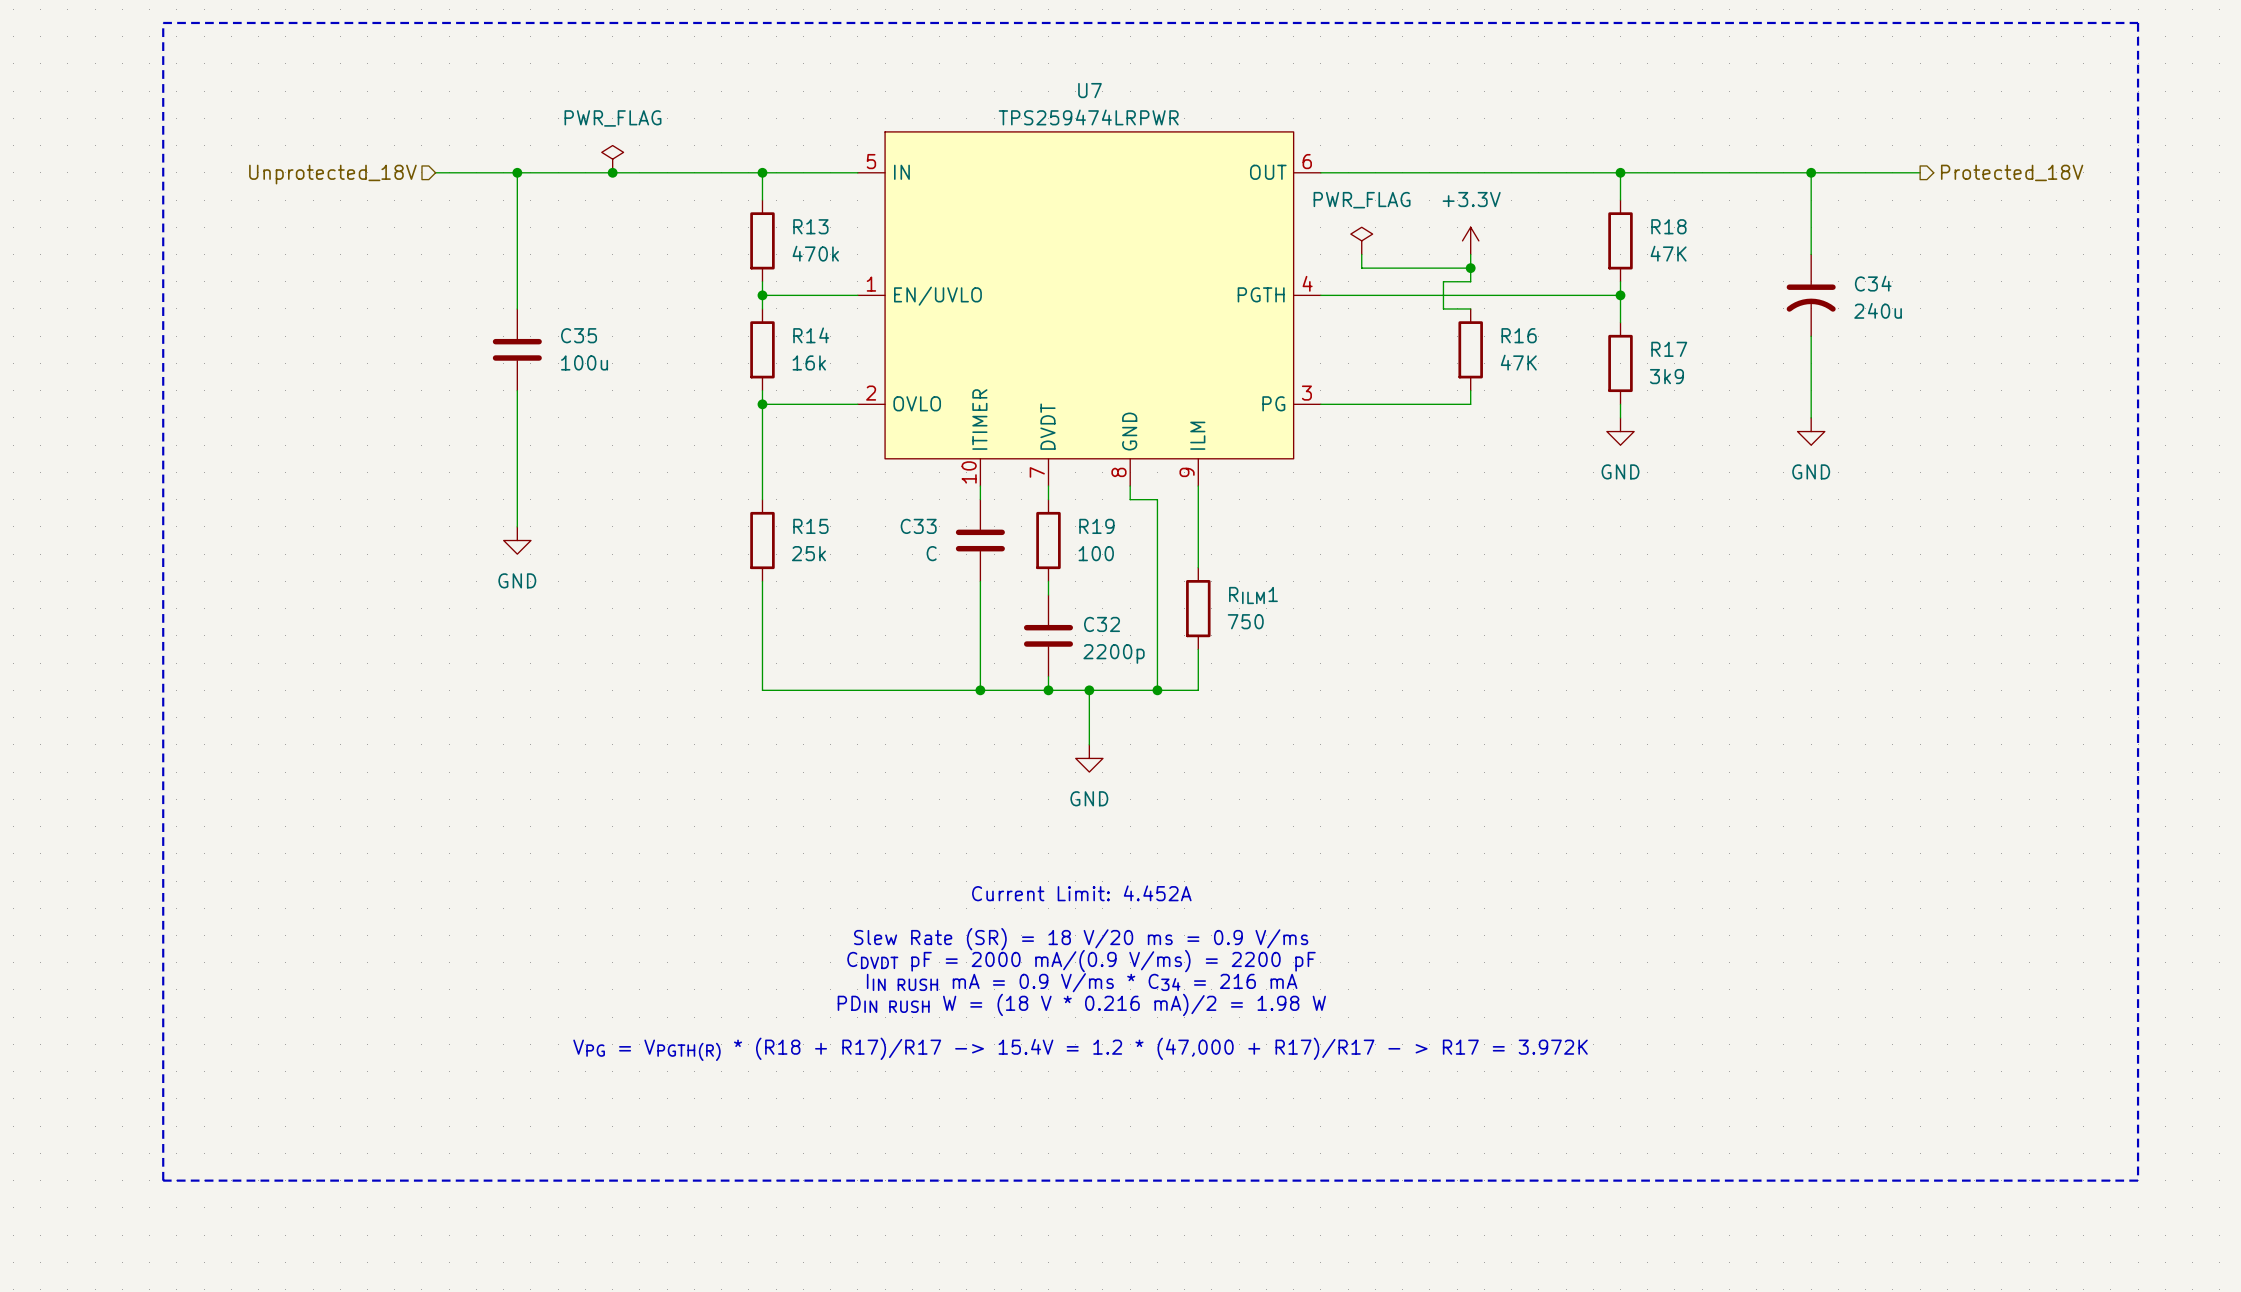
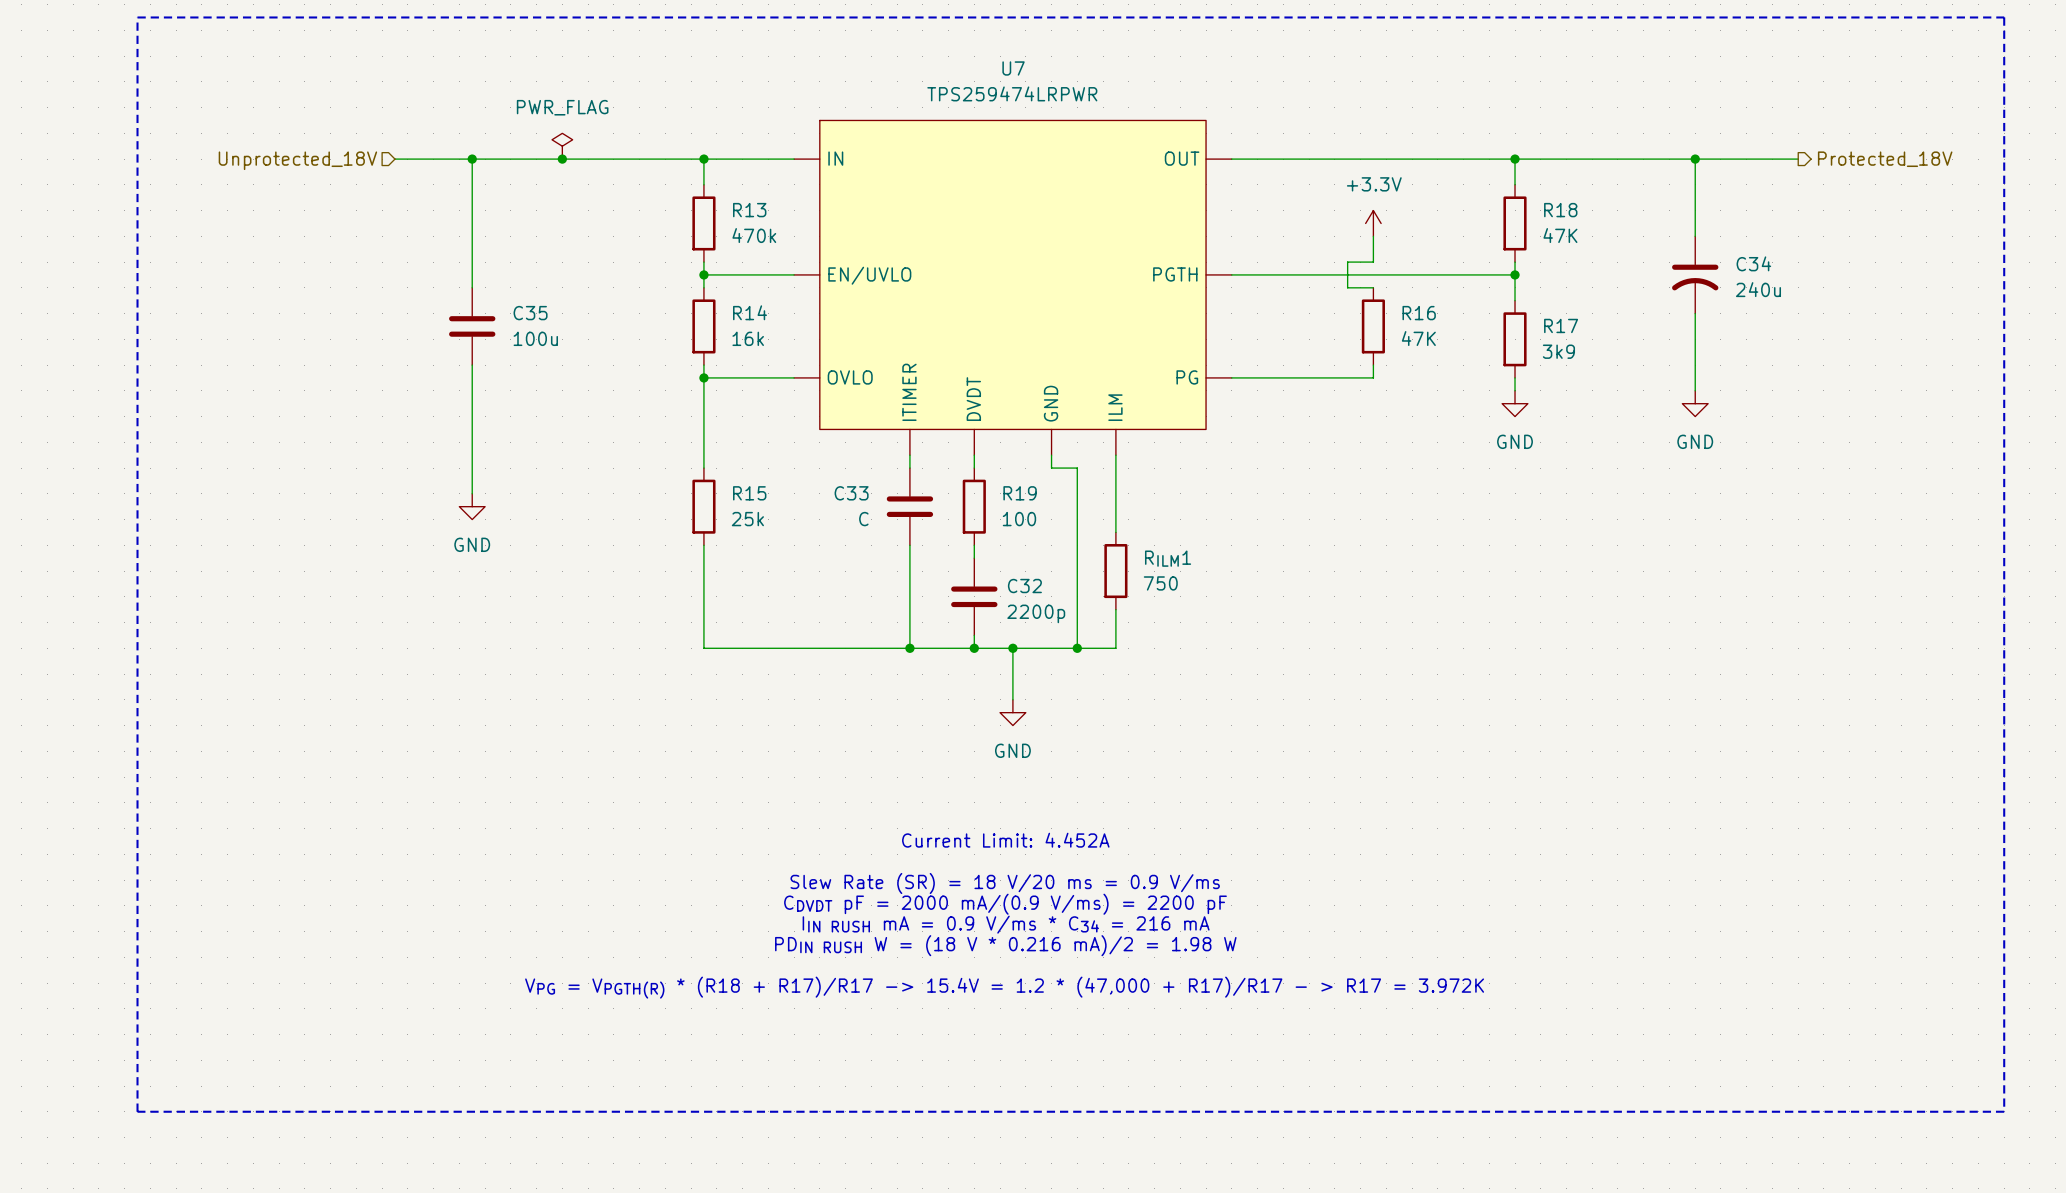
U7 symbol: [857, 131, 1321, 487] -> [794, 120, 1232, 456]
power symbol: PWR_FLAG (1361, 240) -> none
wire: (1361, 254) (1361, 268) (1470, 268) -> none
junction: (1470, 268) -> none

